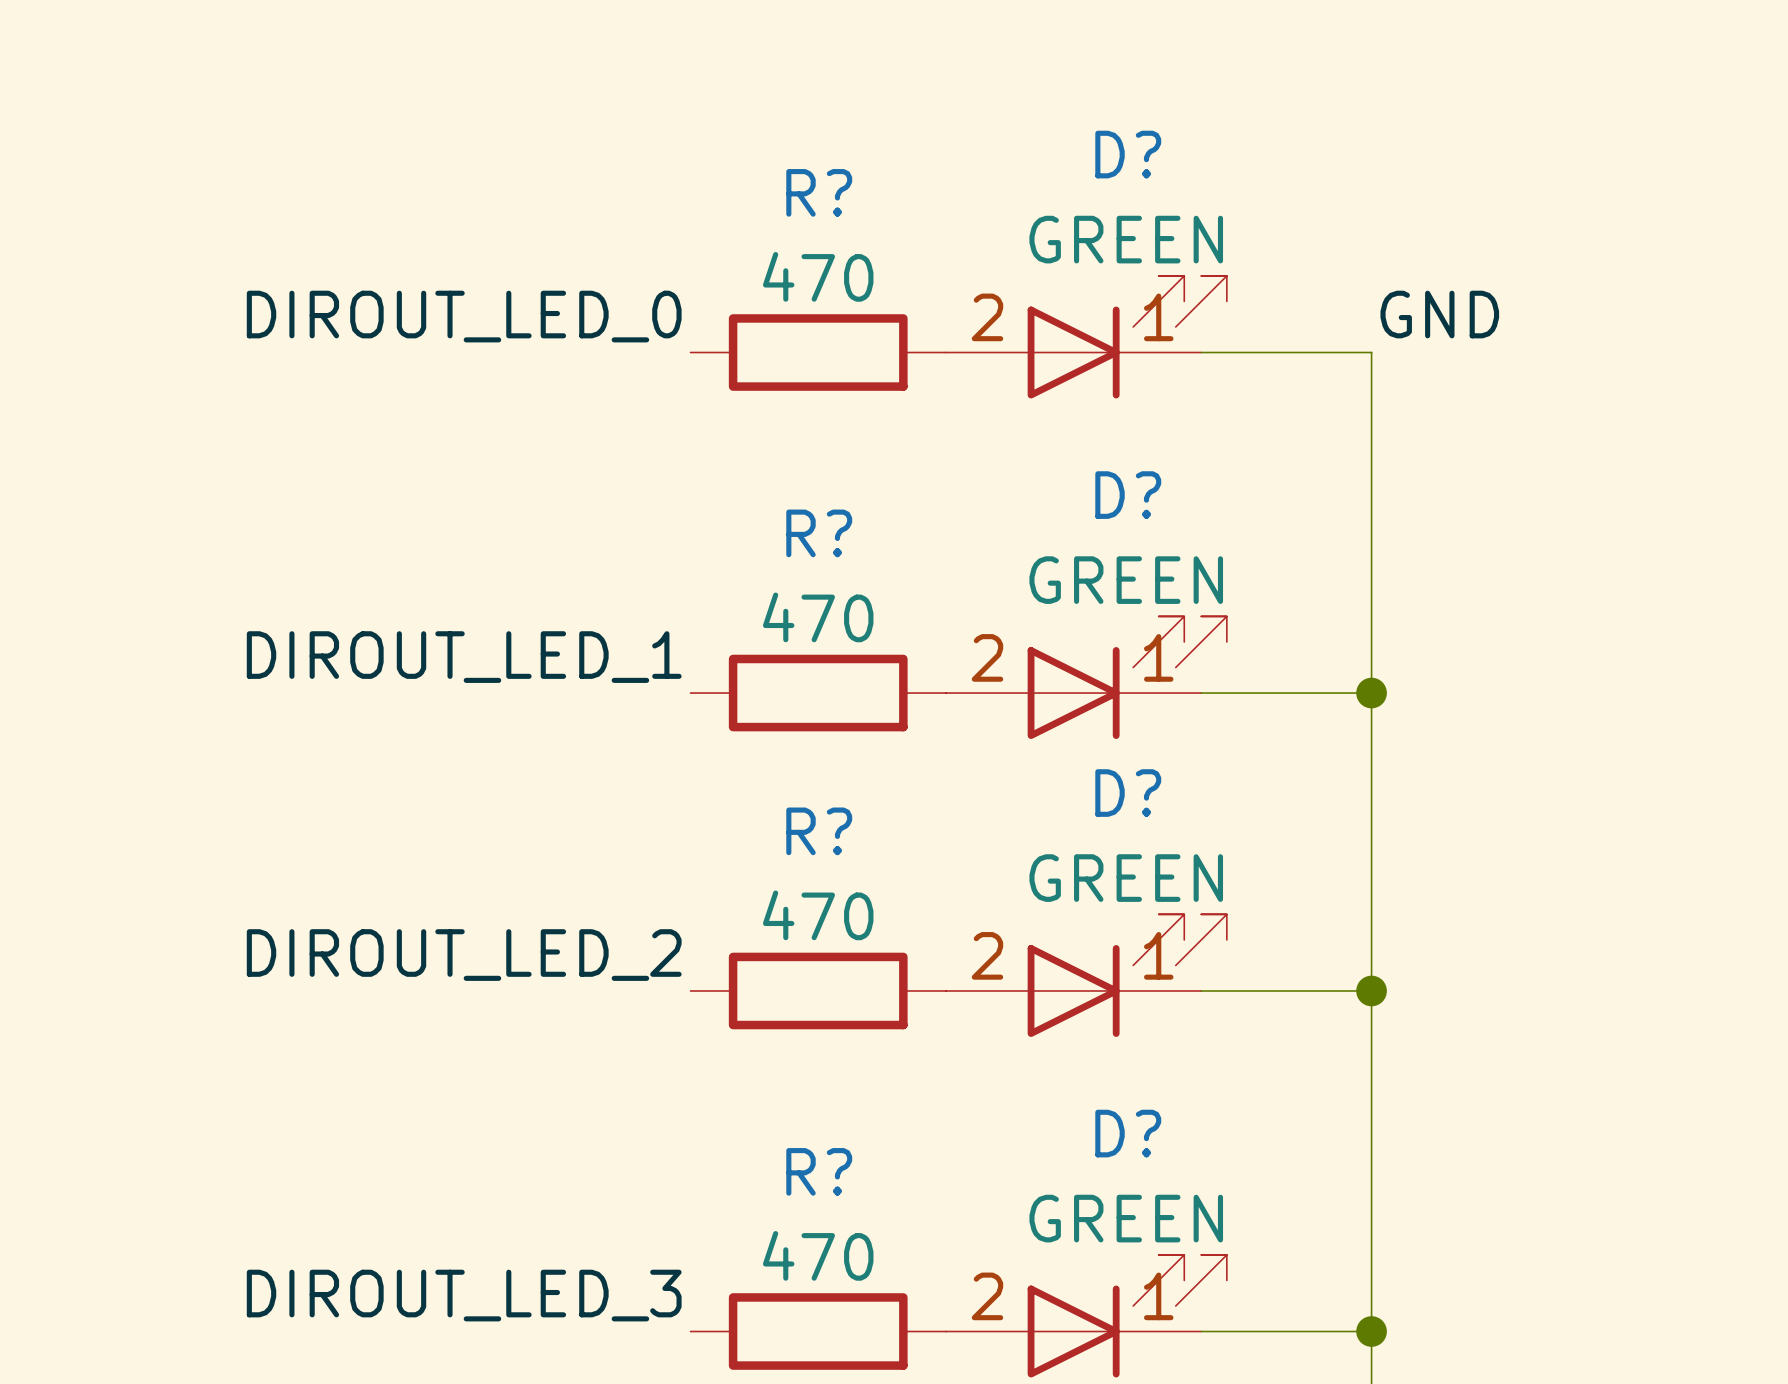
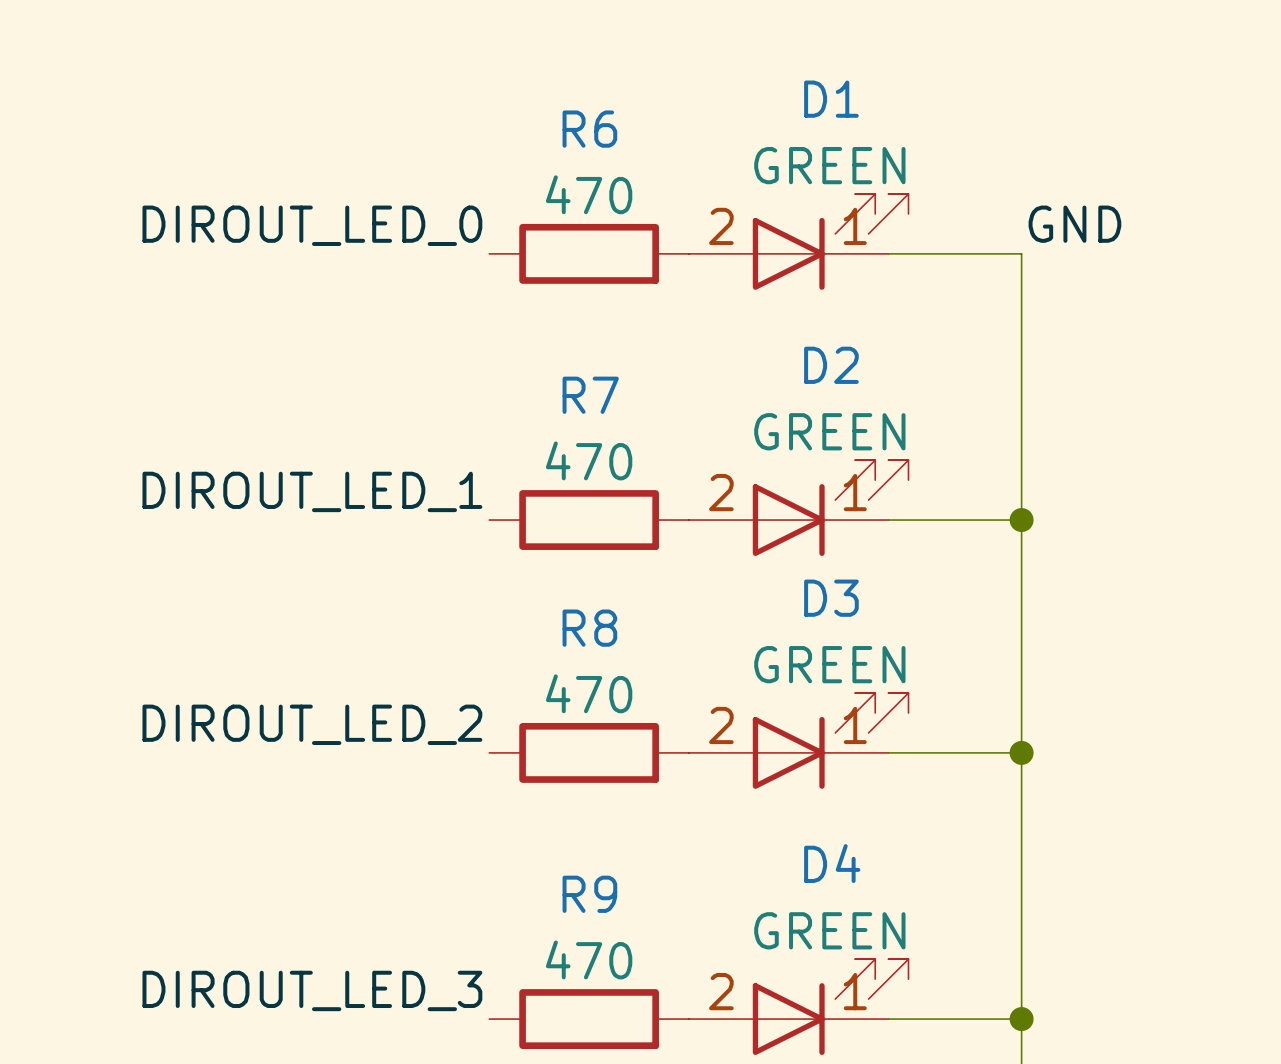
D? name: D? (1128, 154) -> D1 (831, 99)
R? name: R? (819, 192) -> R6 (589, 129)
D? name: D? (1128, 495) -> D2 (831, 365)
R? name: R? (819, 533) -> R7 (590, 395)
D? name: D? (1128, 793) -> D3 (831, 598)
R? name: R? (819, 831) -> R8 (589, 628)
D? name: D? (1128, 1133) -> D4 (832, 863)
R? name: R? (819, 1171) -> R9 (589, 894)

